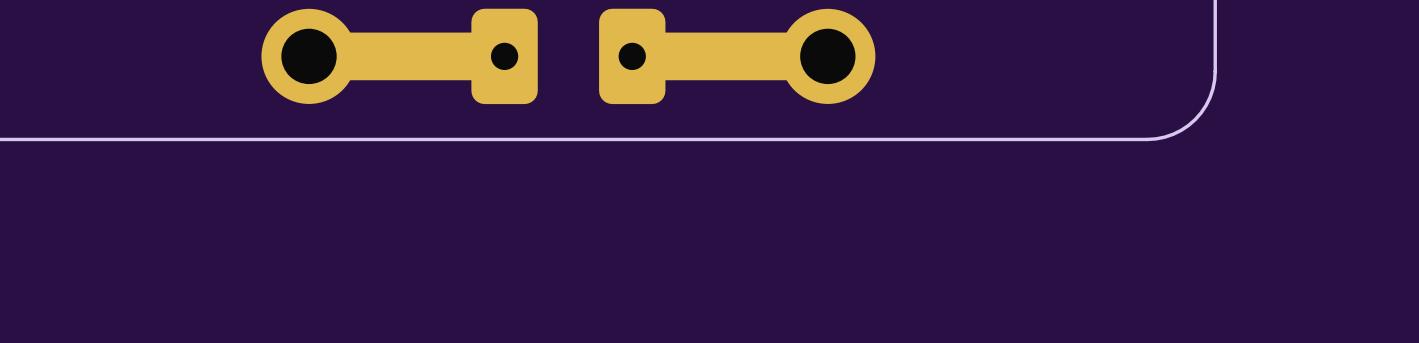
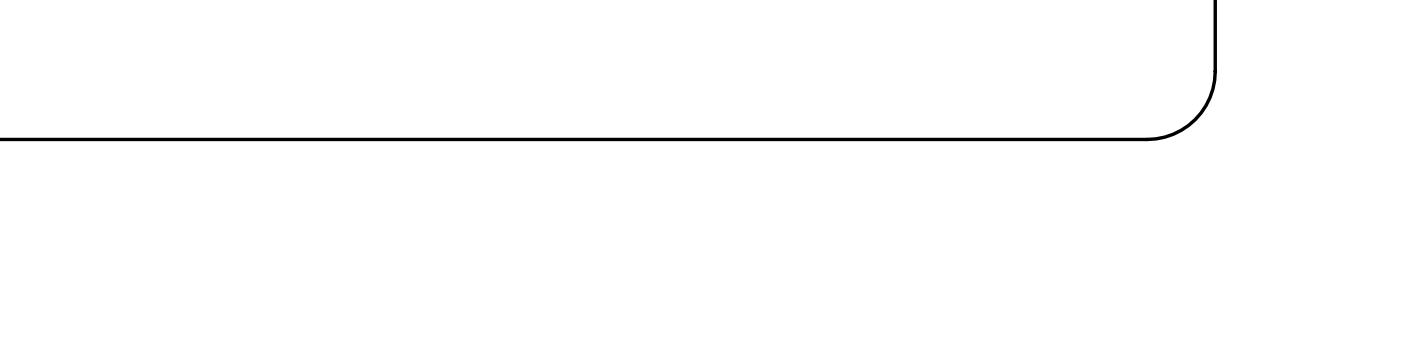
part: (568, 56) -> none

